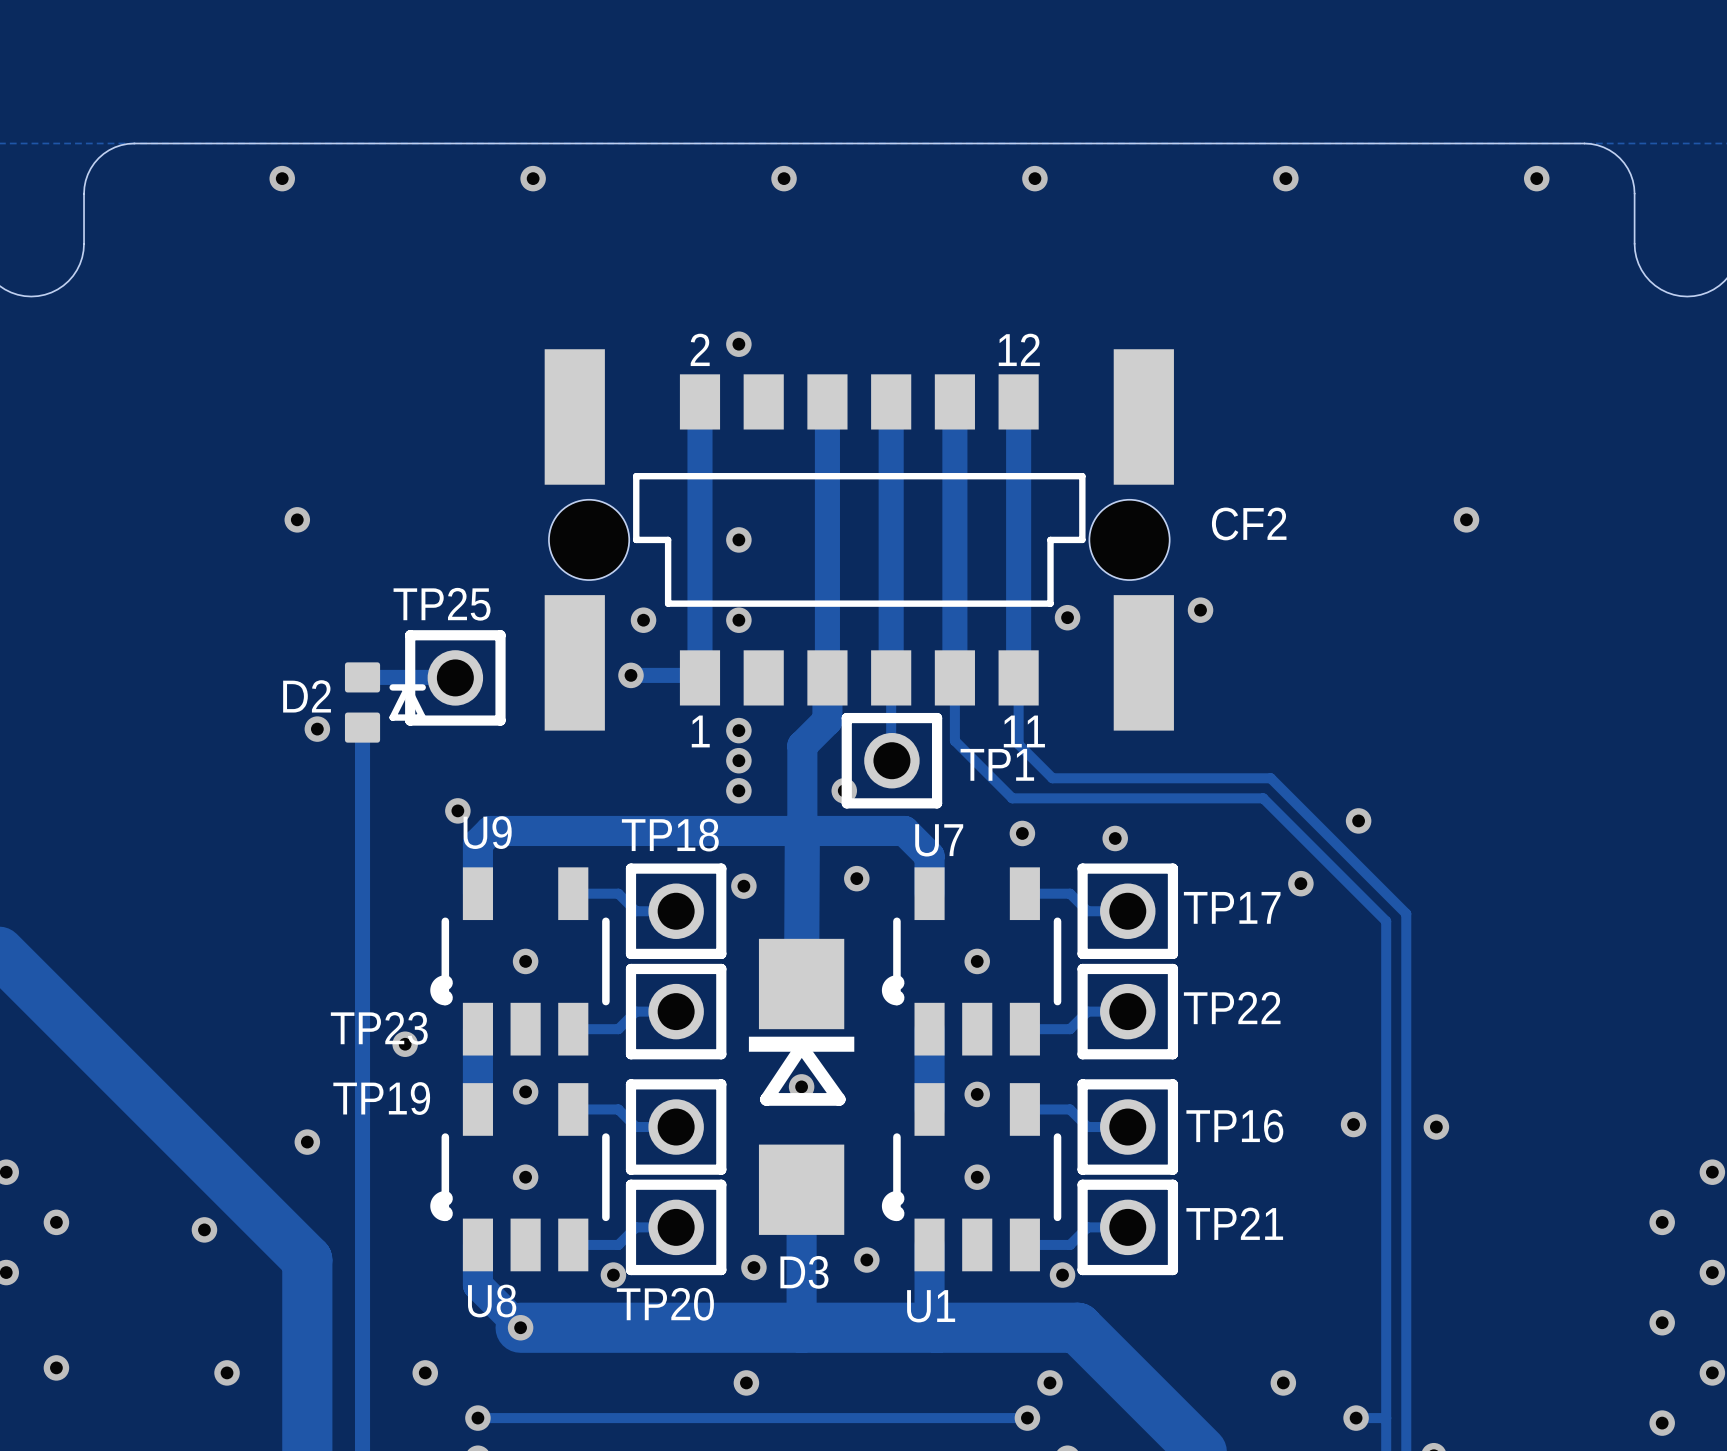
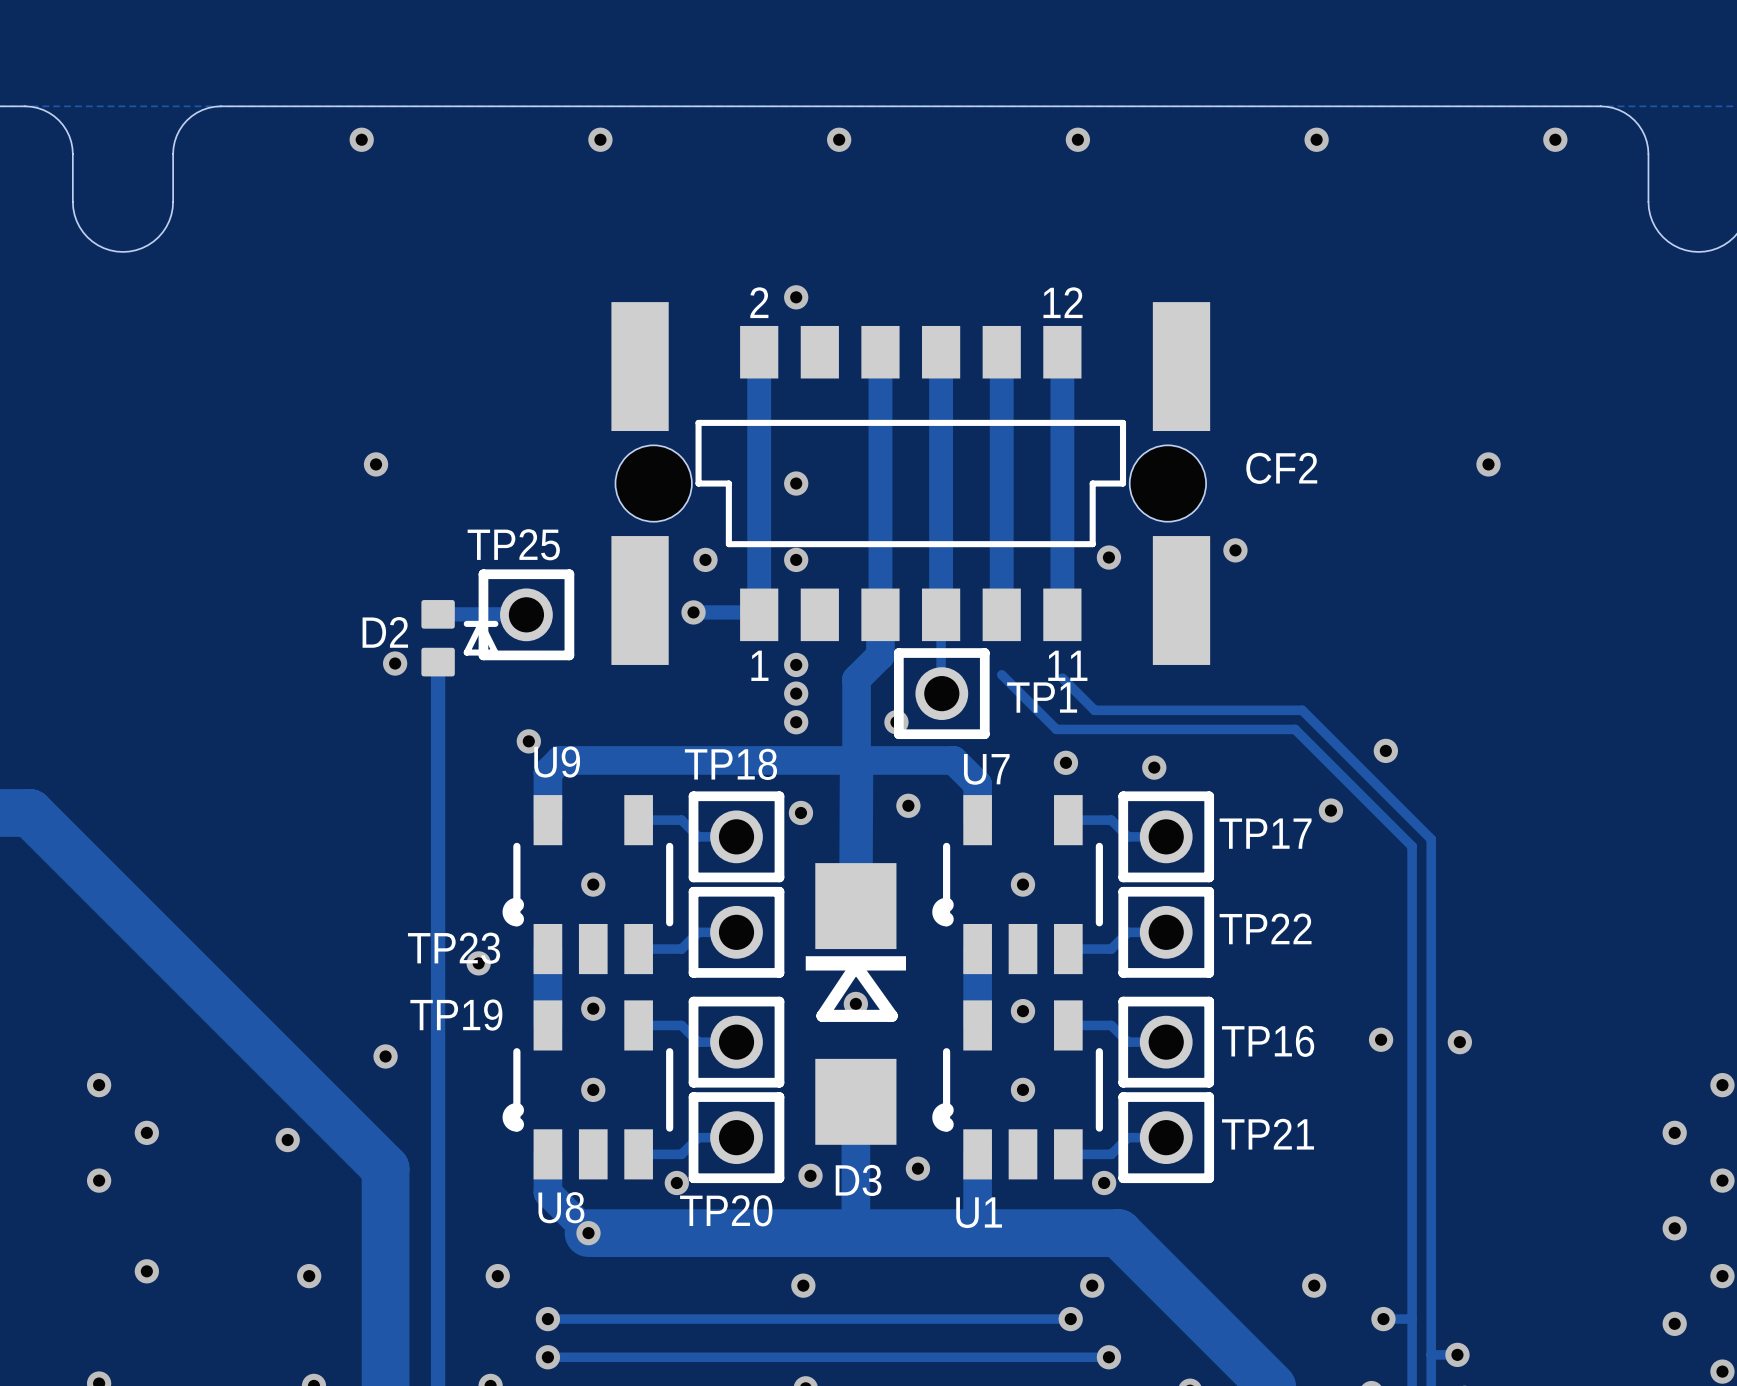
track: (954, 677) (954, 740) -> none
track: (1018, 677) (1018, 744) -> none

